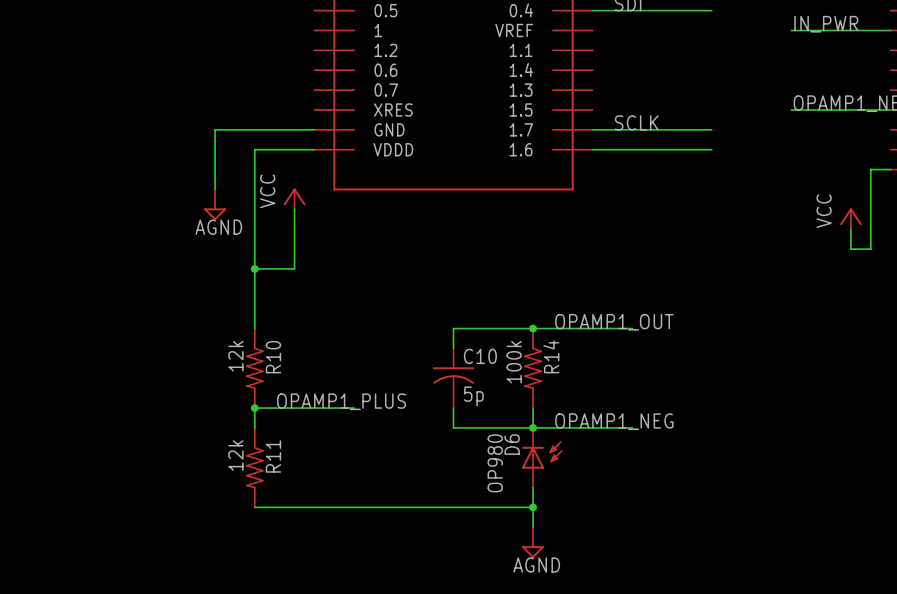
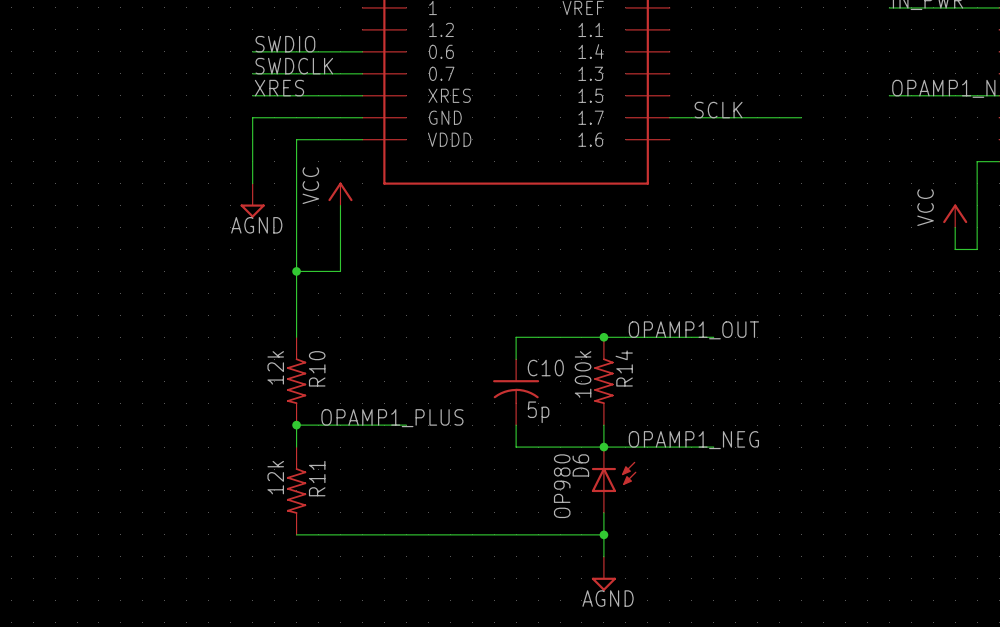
label: none -> SWDIO (285, 44)
wire: none -> (252, 51) (362, 51)
label: none -> SWDCLK (294, 66)
wire: none -> (252, 73) (362, 73)
label: none -> XRES (279, 88)
wire: none -> (252, 95) (362, 95)
wire: (592, 149) (711, 149) -> none

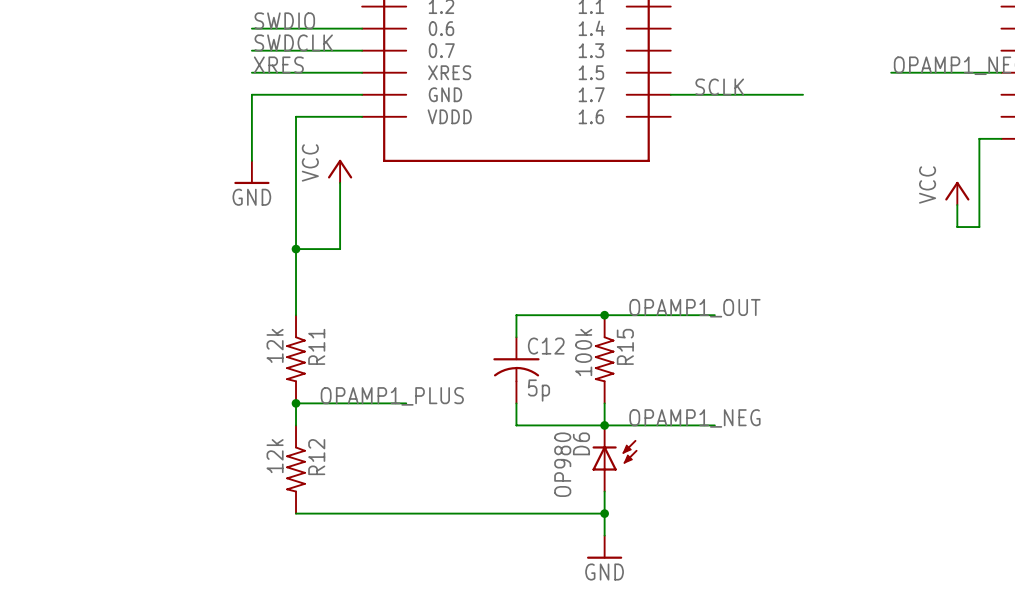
power symbol: AGND (252, 200) -> GND (251, 172)
R10 name: R10 (317, 368) -> R11 (316, 346)
C10 name: C10 (545, 368) -> C12 (546, 346)
R14 name: R14 (624, 368) -> R15 (625, 346)
R11 name: R11 (317, 478) -> R12 (316, 457)
power symbol: AGND (603, 573) -> GND (604, 547)

